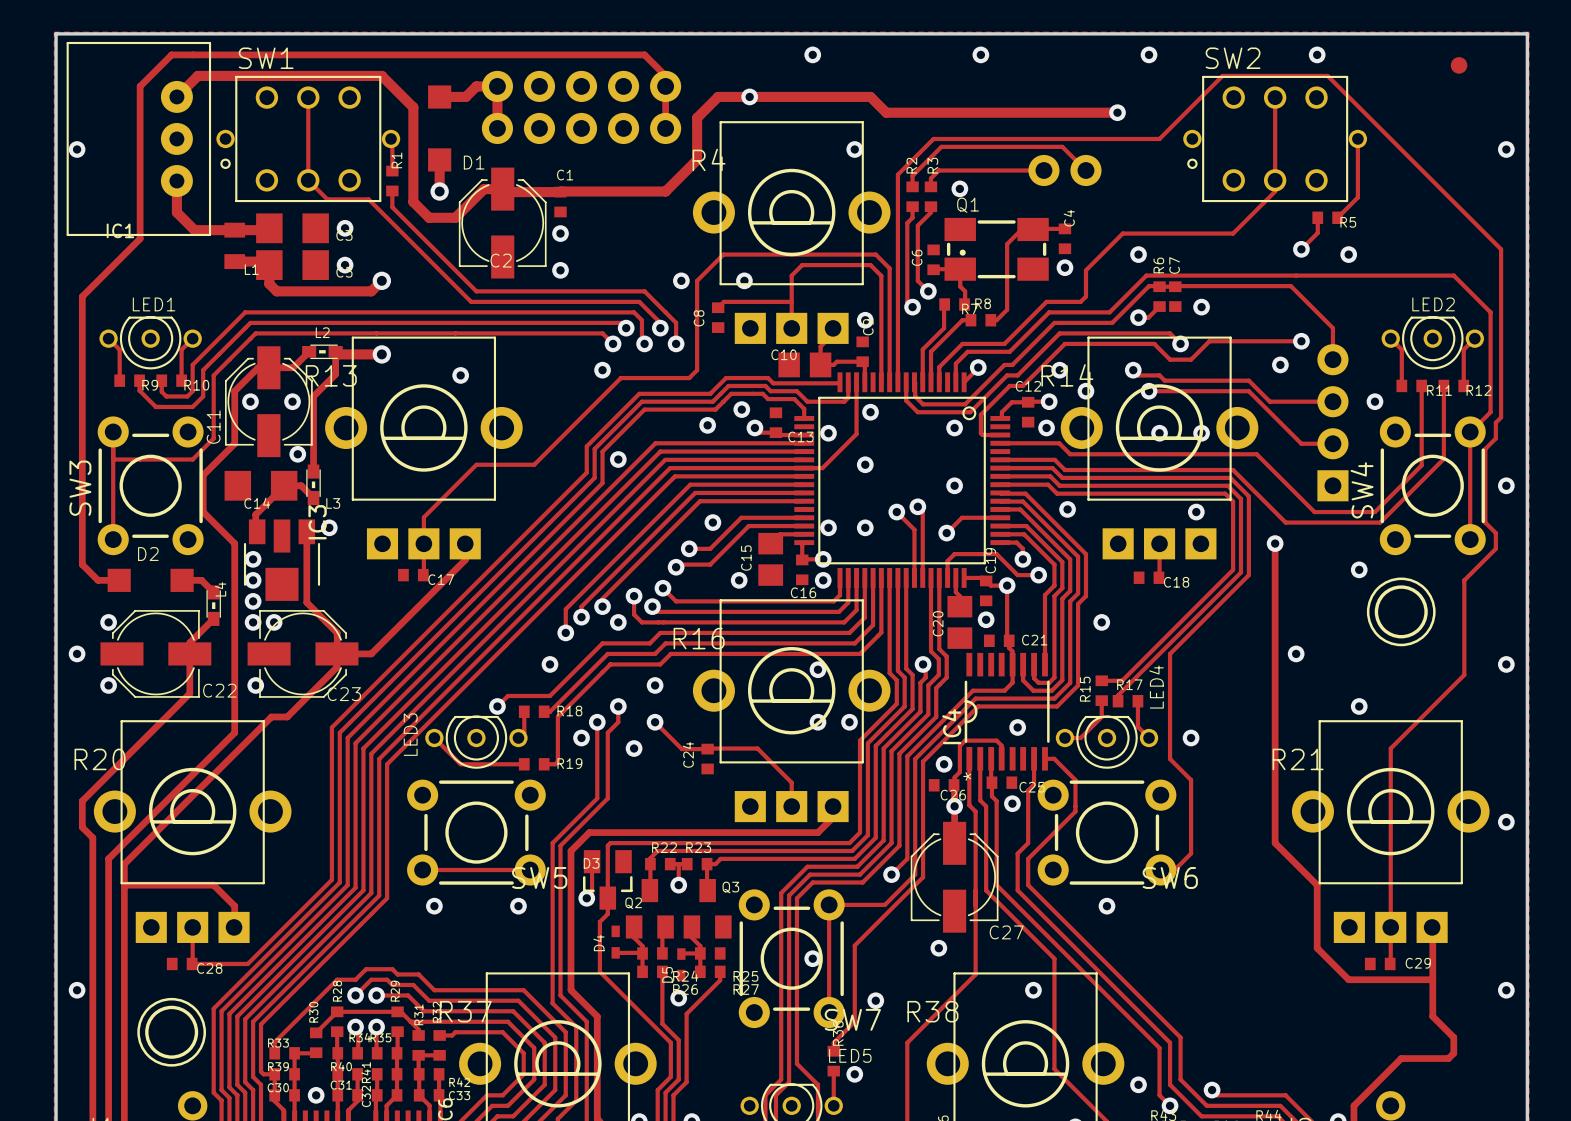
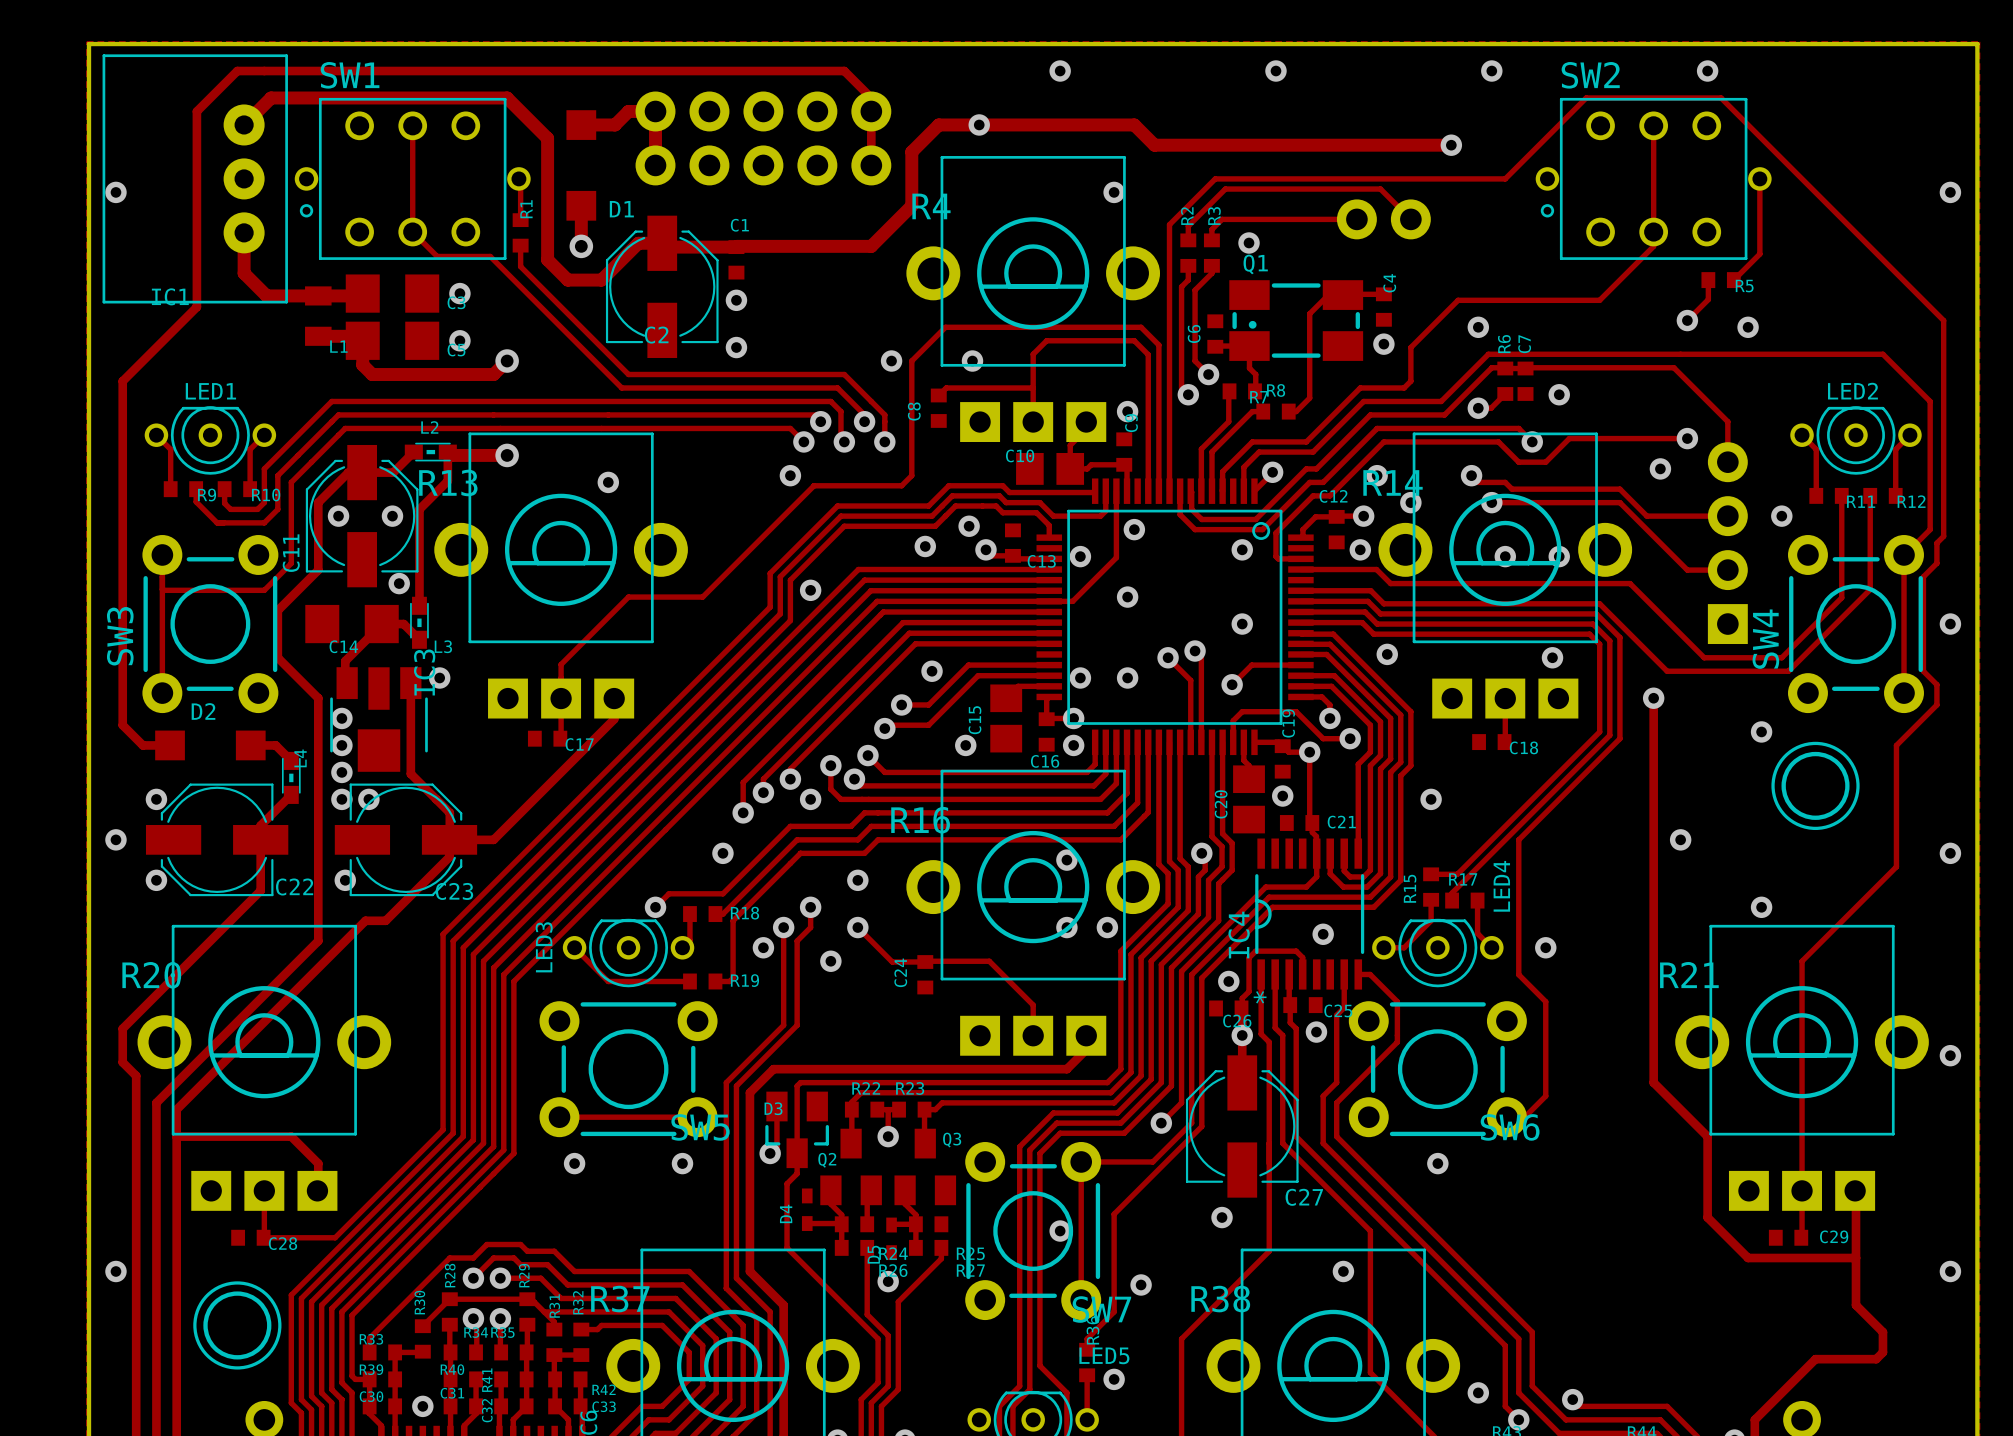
part: (1459, 65) -> none

